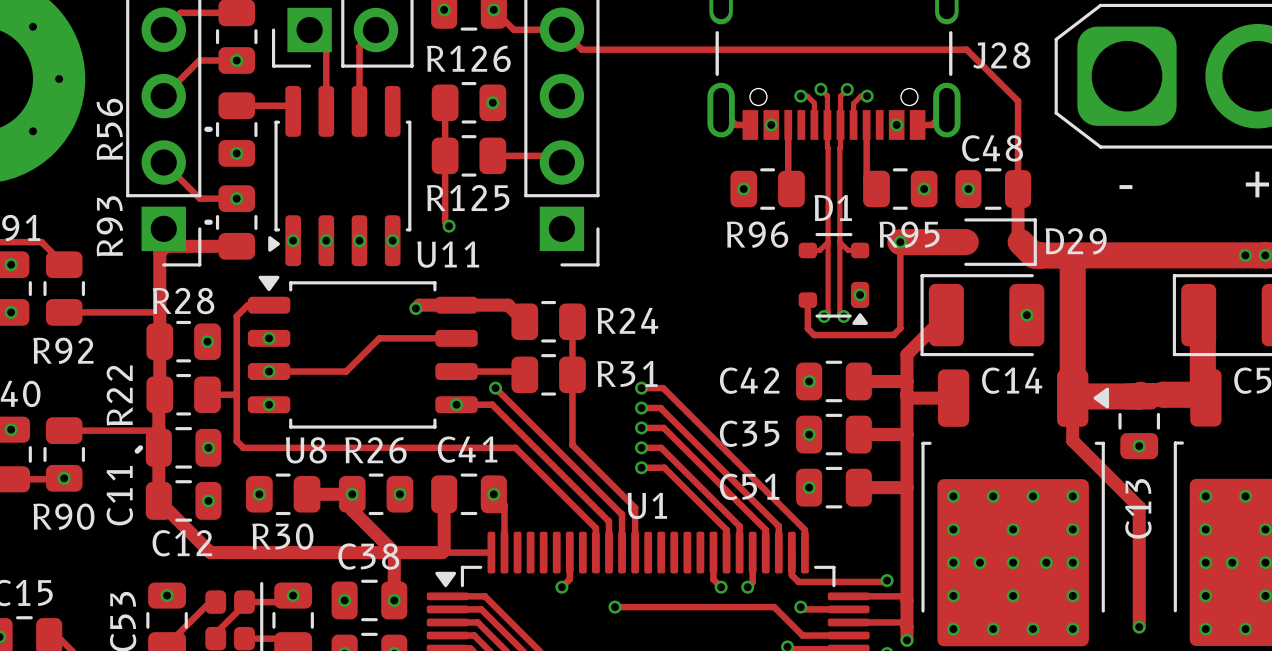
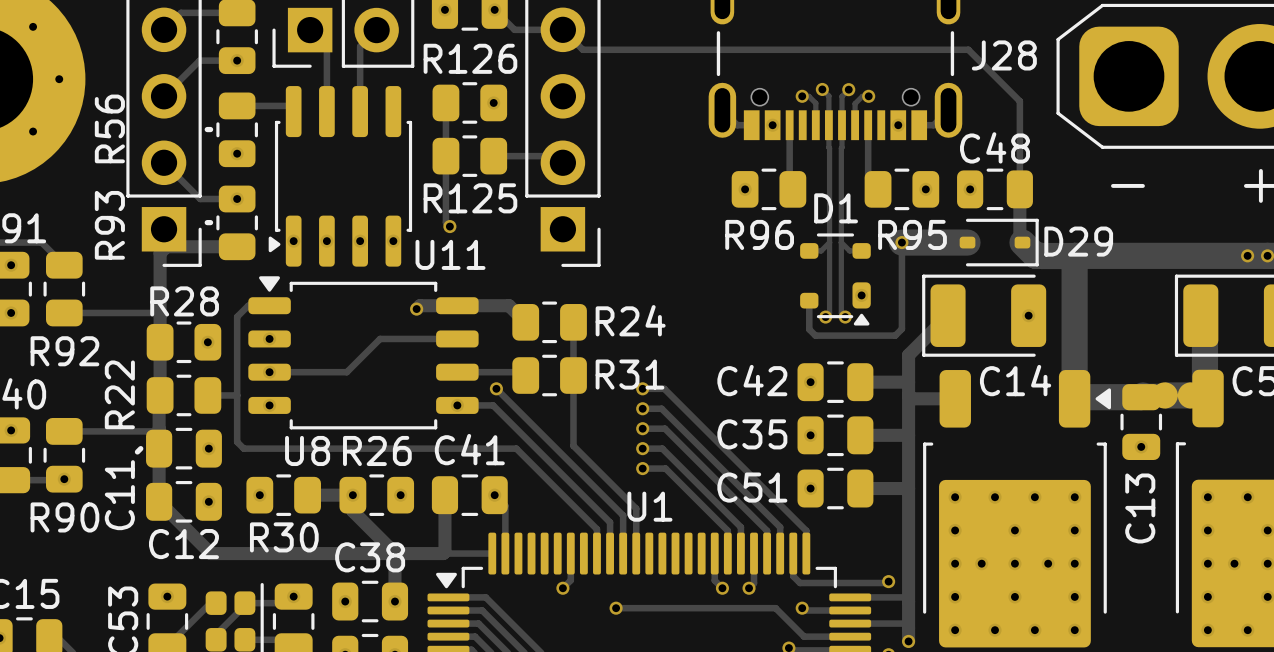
track: (1072, 398) (1072, 440) (1139, 507) (1139, 627) -> none
via: (1139, 627) -> none

